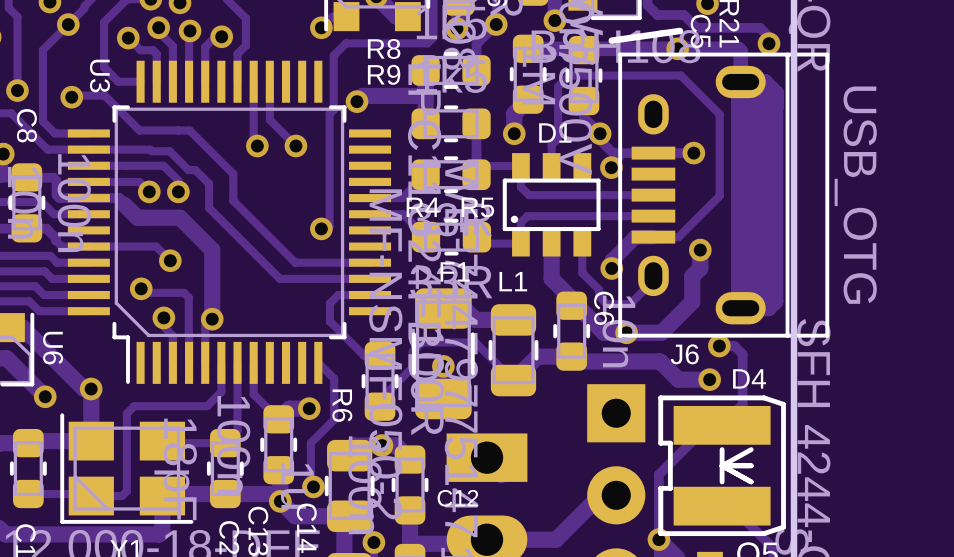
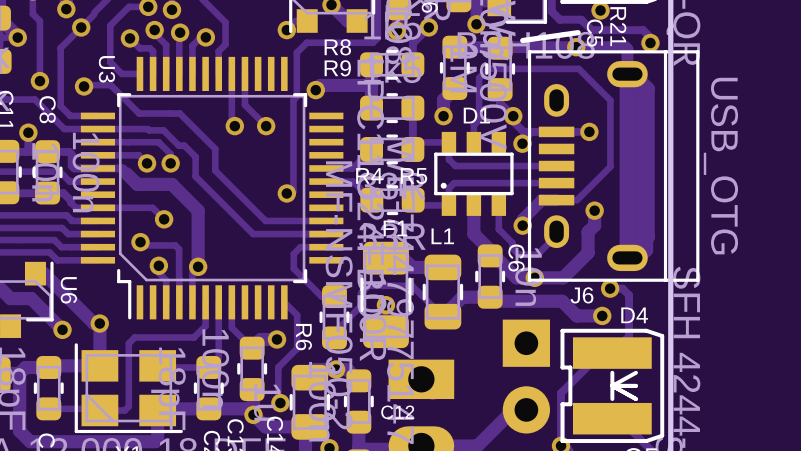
track: (748, 82) (764, 82) (775, 93) (775, 301) (768, 308) (754, 308) -> none

